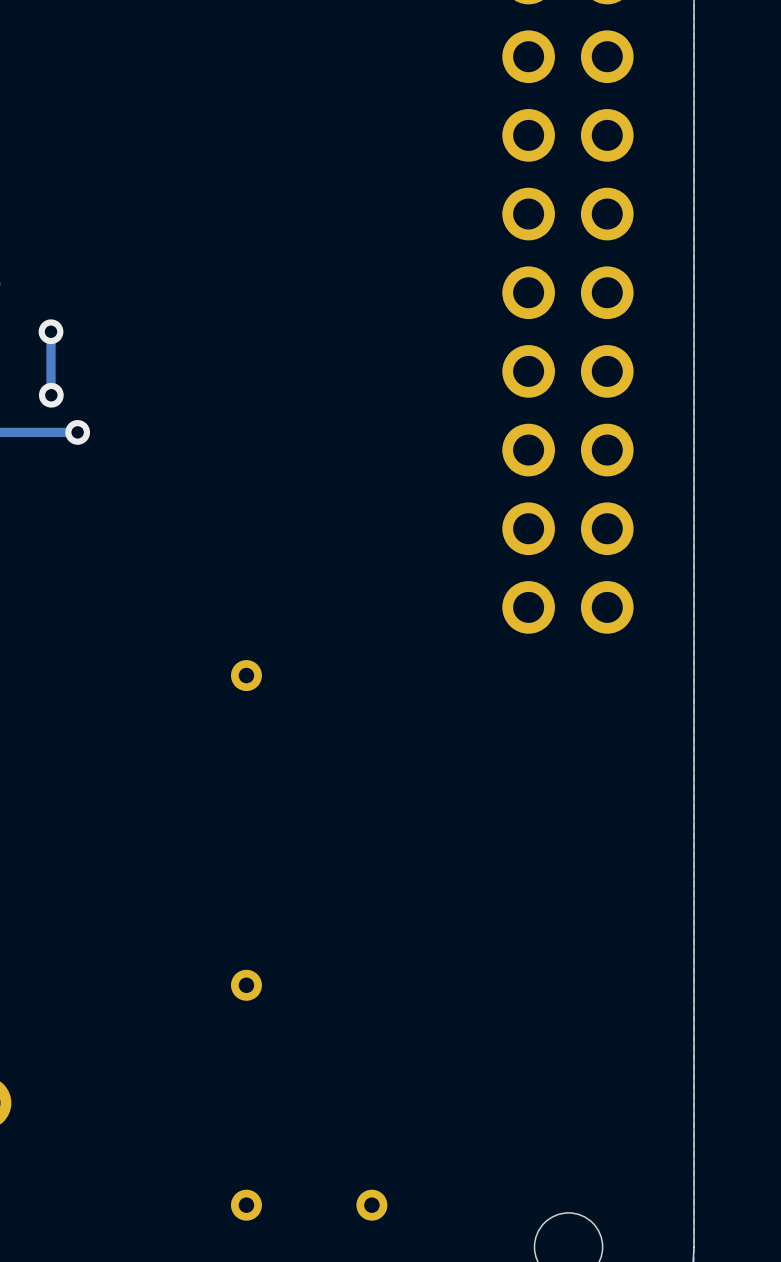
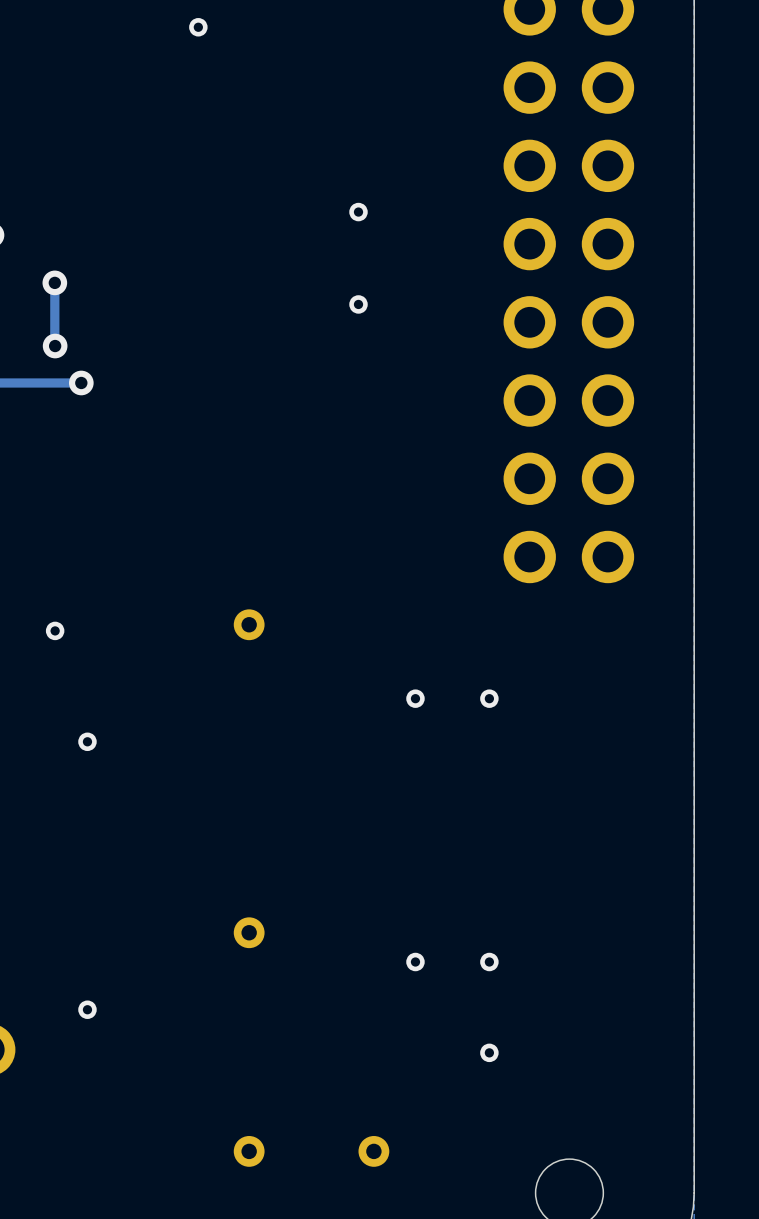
via: none -> (198, 27)
via: none -> (358, 212)
via: none -> (358, 304)
via: none -> (55, 630)
via: none -> (415, 698)
via: none -> (489, 698)
via: none -> (87, 741)
via: none -> (415, 962)
via: none -> (489, 962)
via: none -> (87, 1009)
via: none -> (489, 1052)

